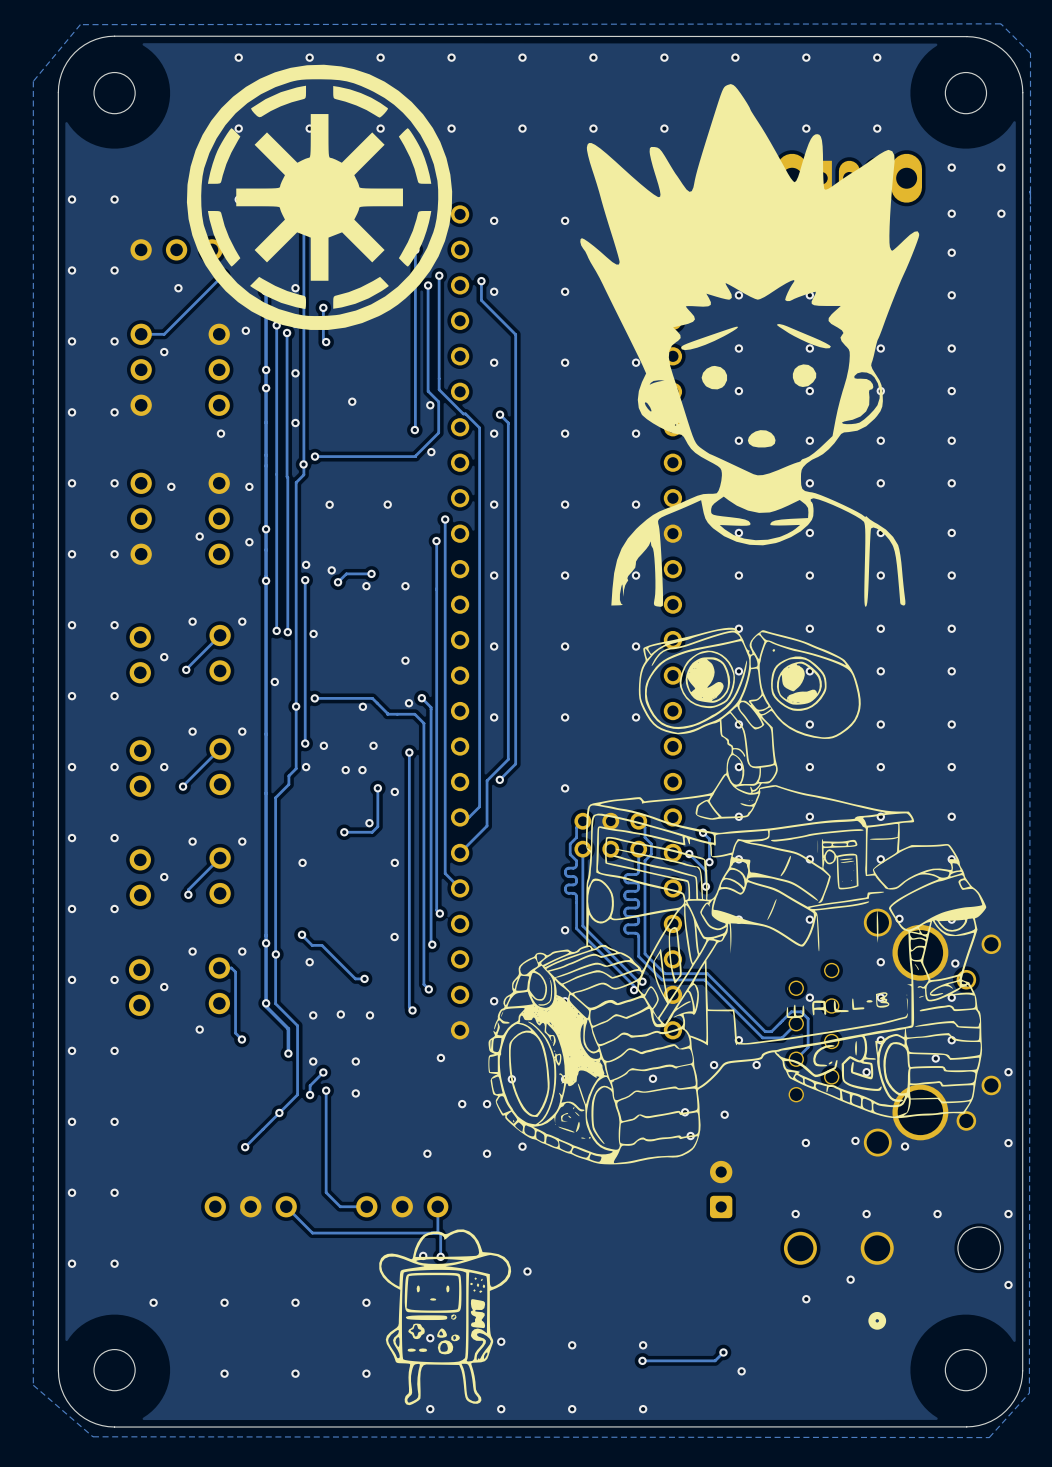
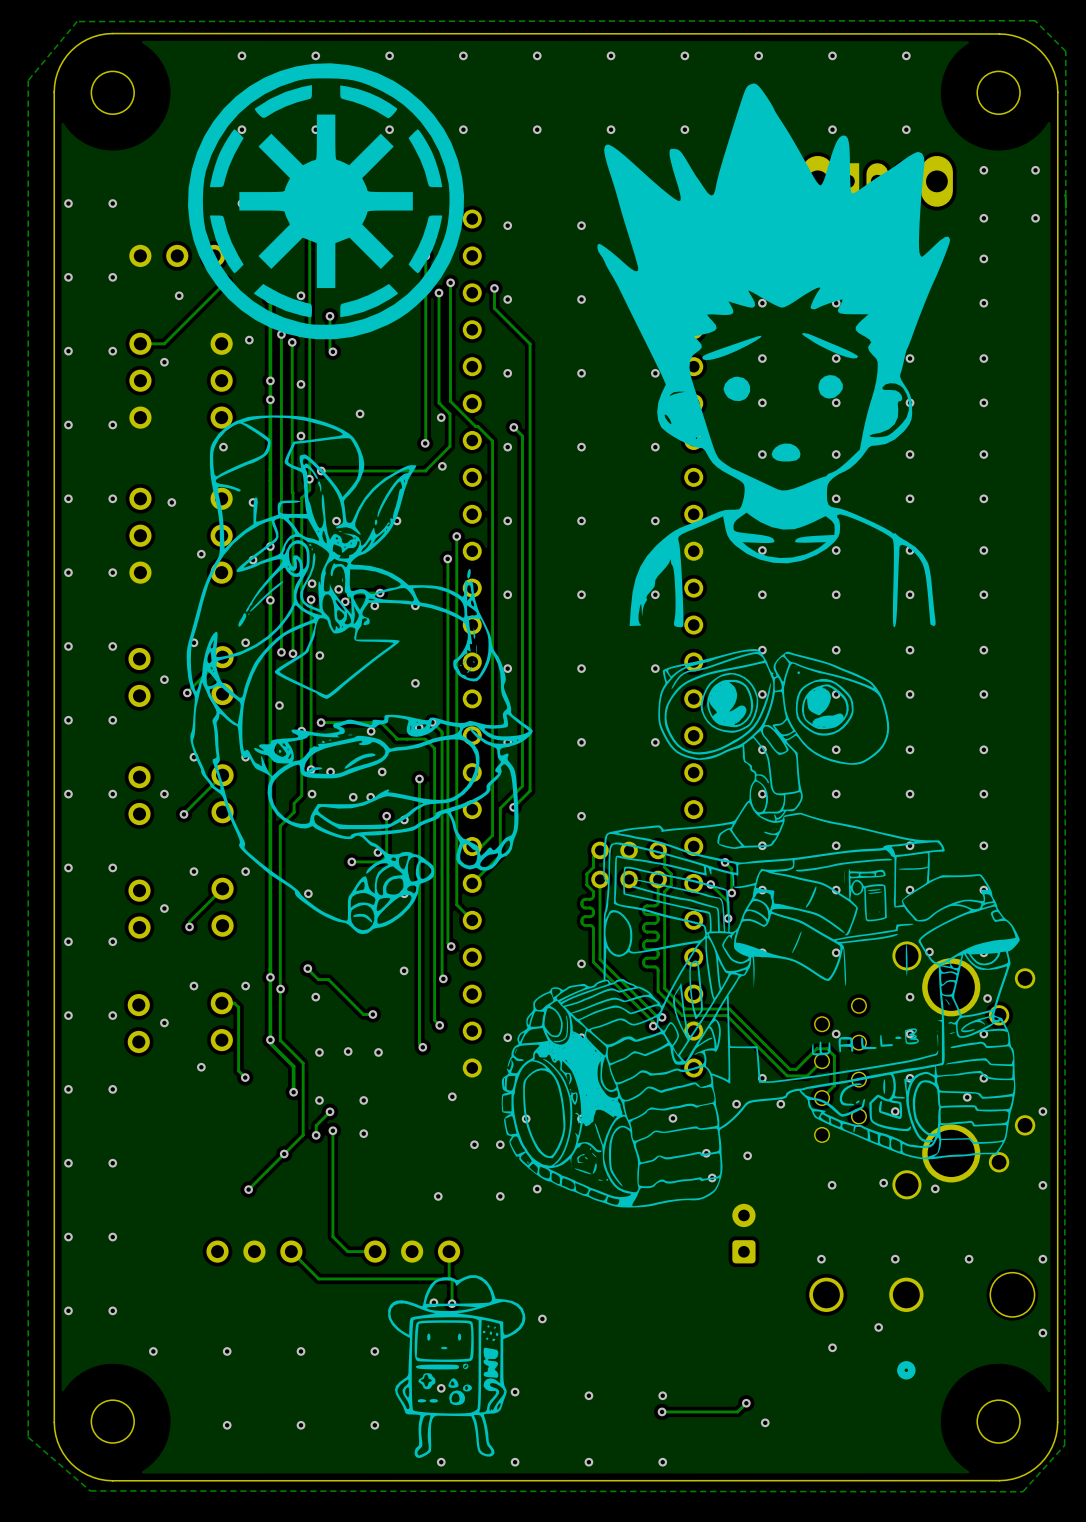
drawing: none -> [186, 415, 533, 935]

